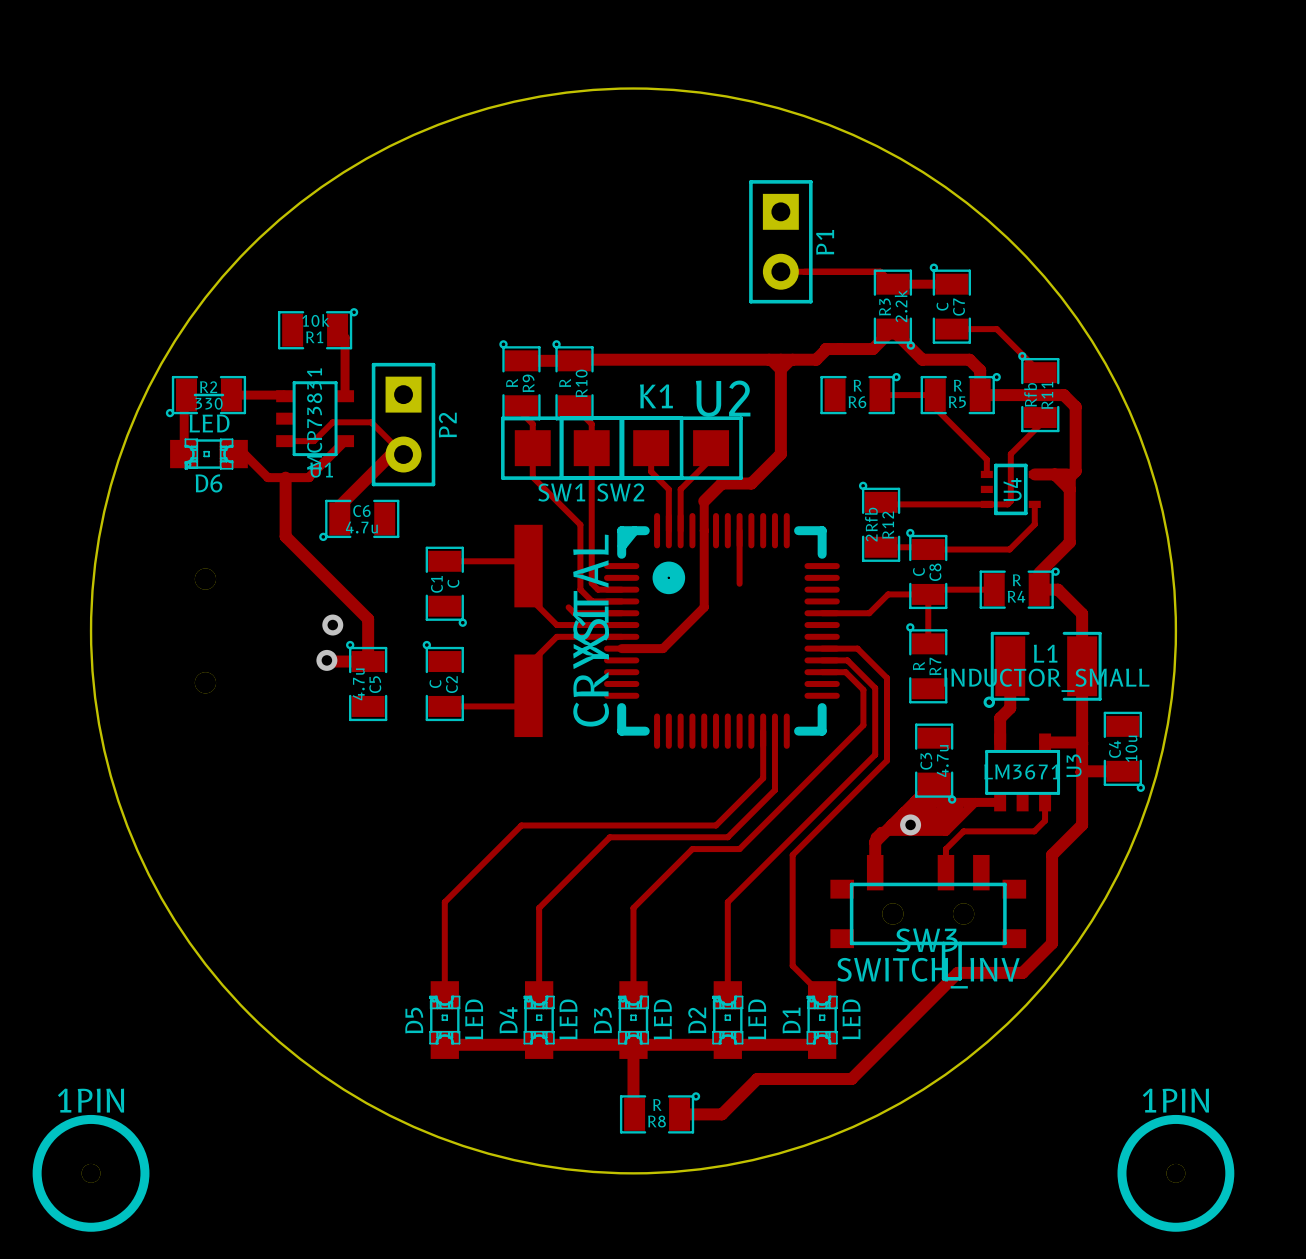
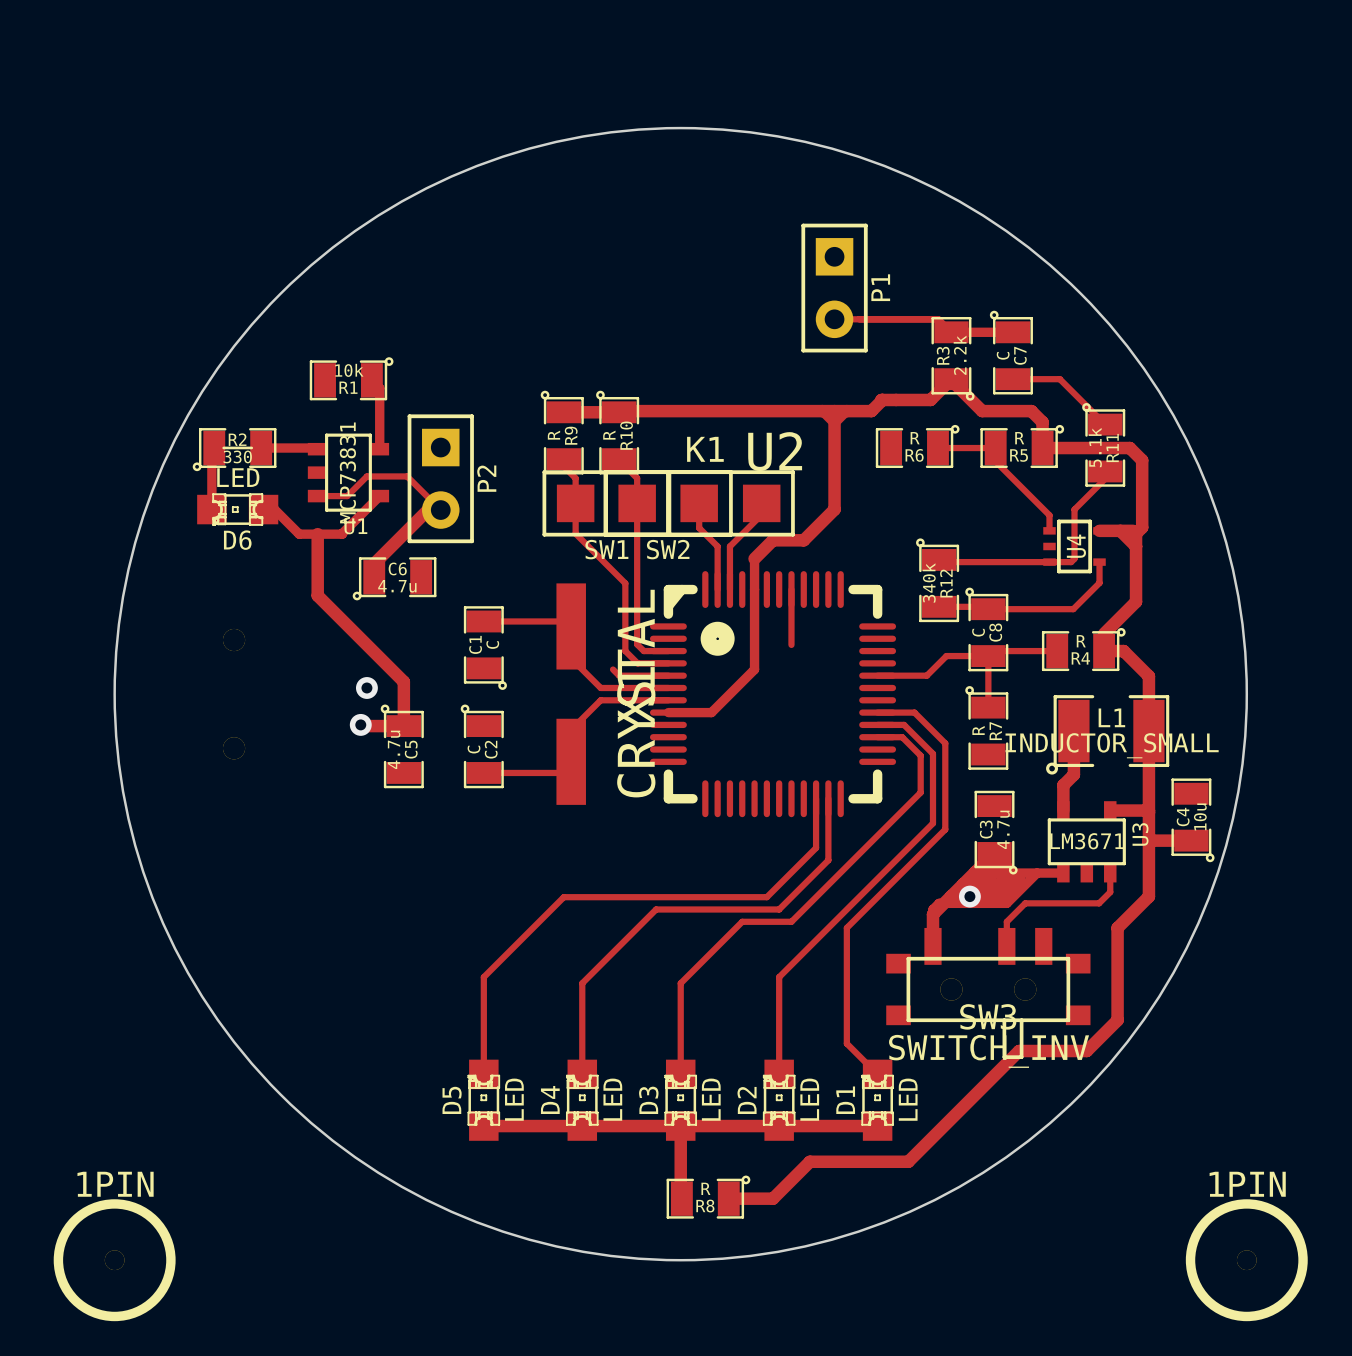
R11 value: Rfb (1030, 394) -> 5.1k (1095, 447)
R12 value: 2Rfb (871, 524) -> 340k (929, 582)

